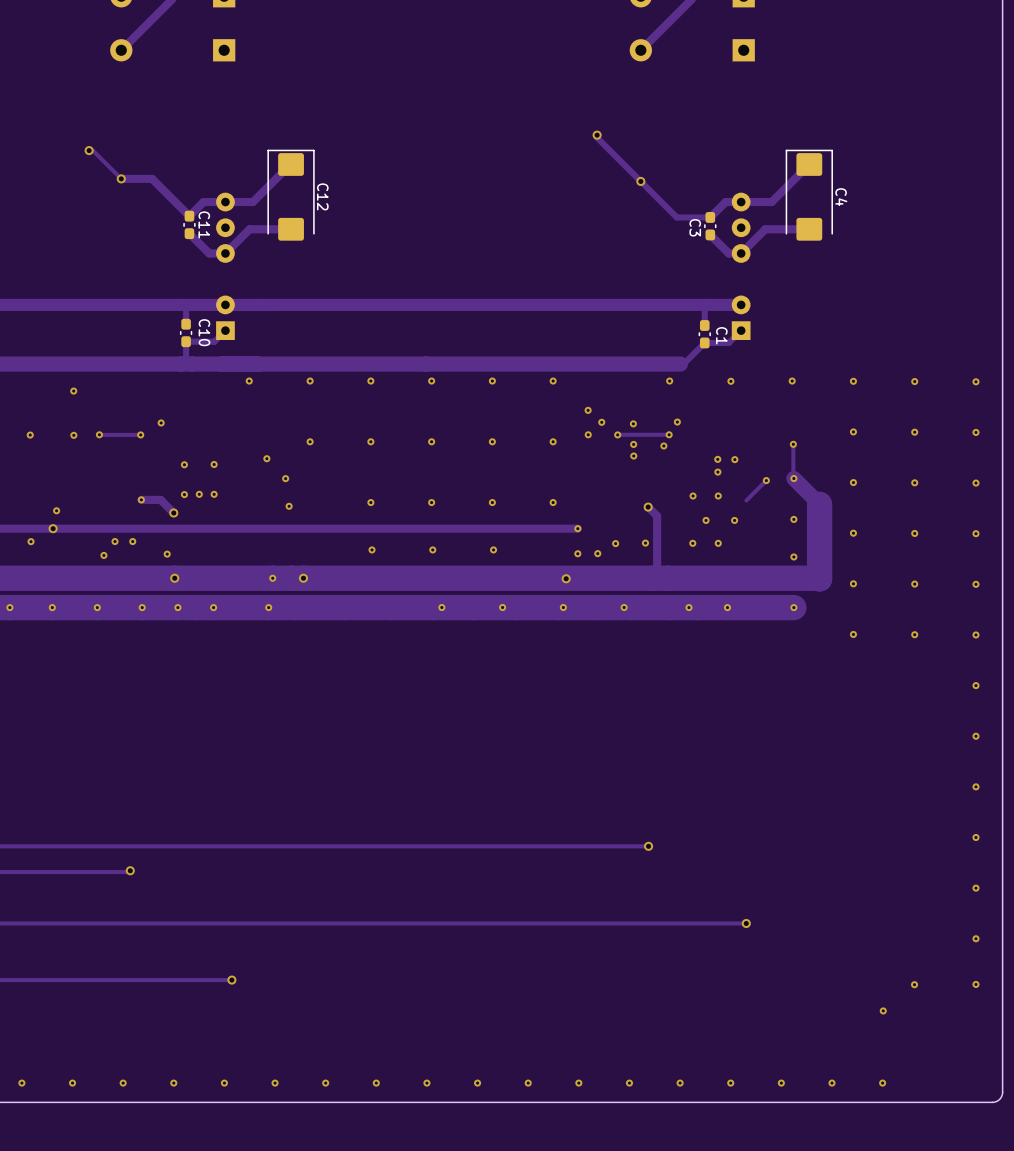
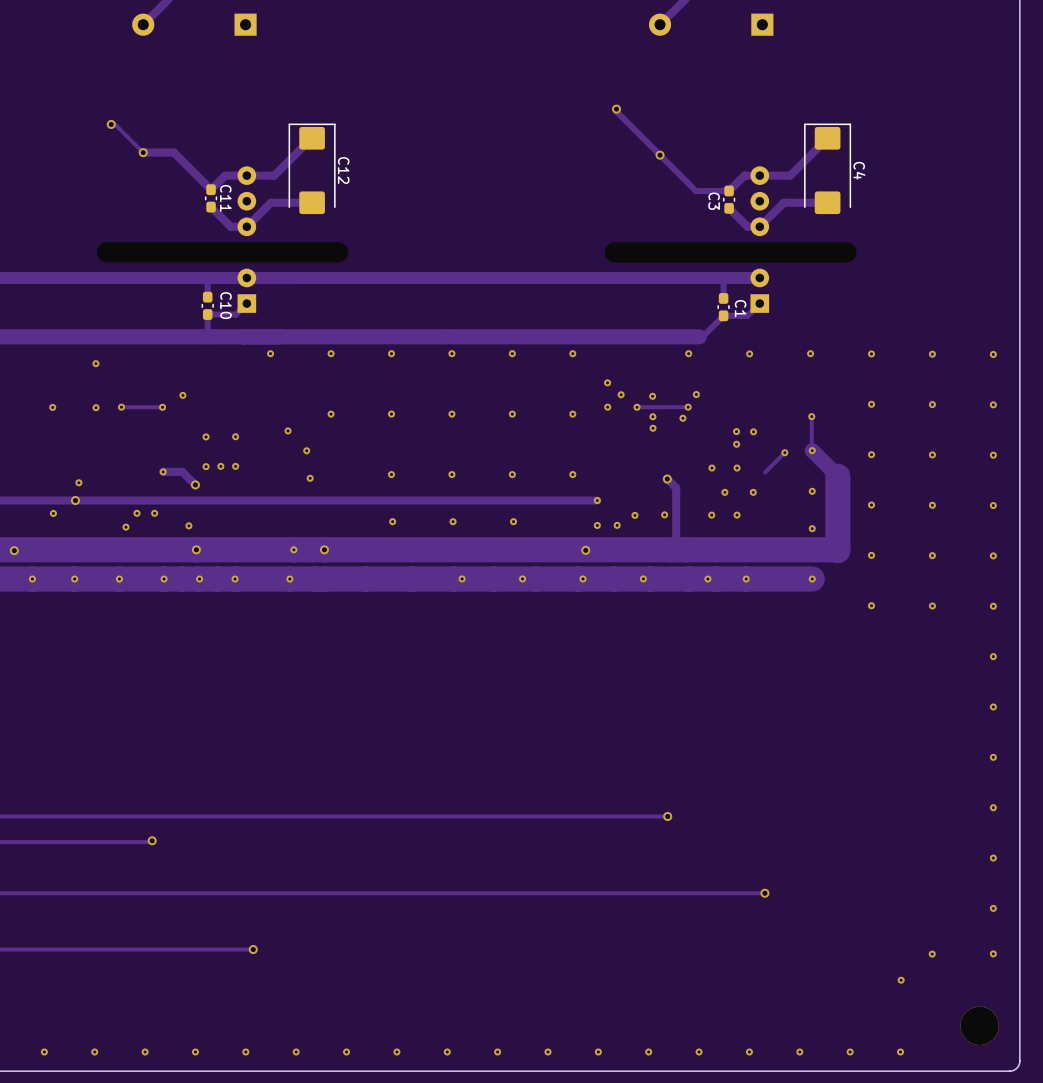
part: none -> (222, 252)
part: none -> (730, 252)
part: none -> (979, 1025)

